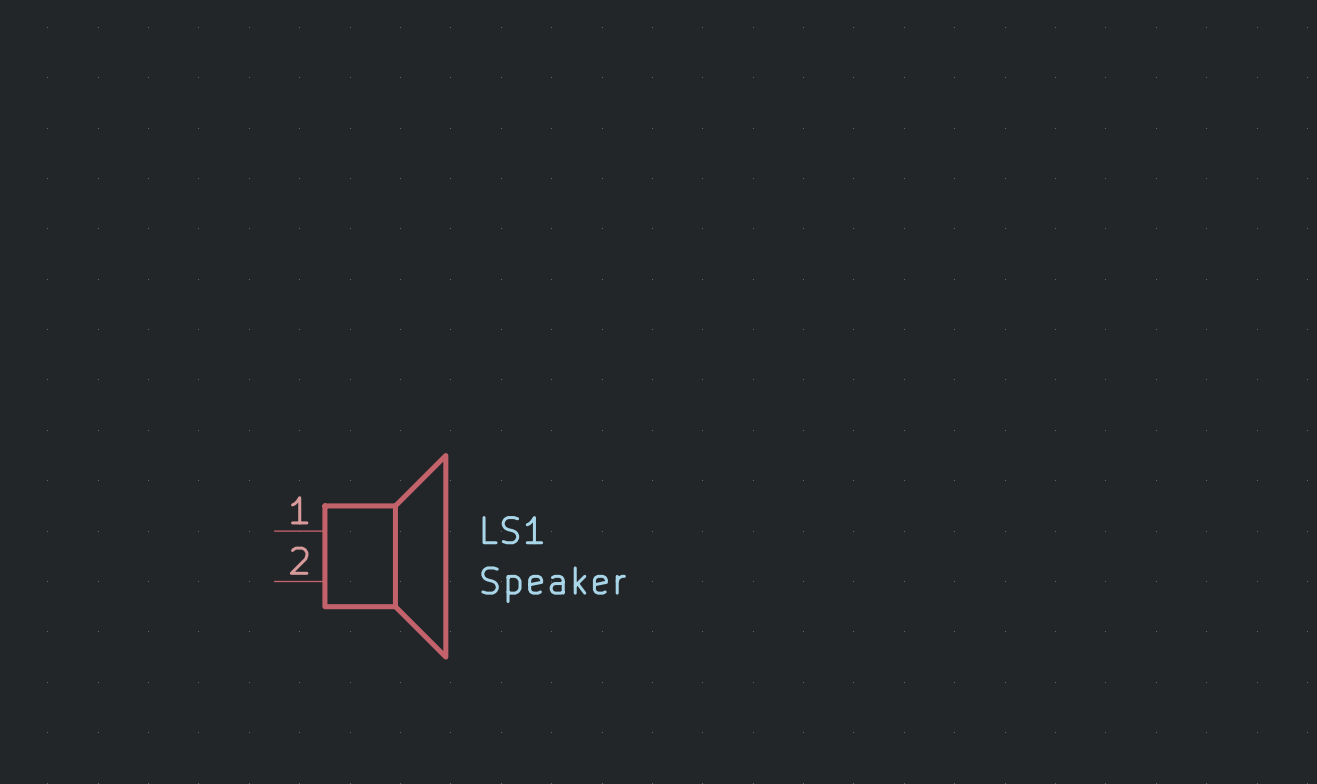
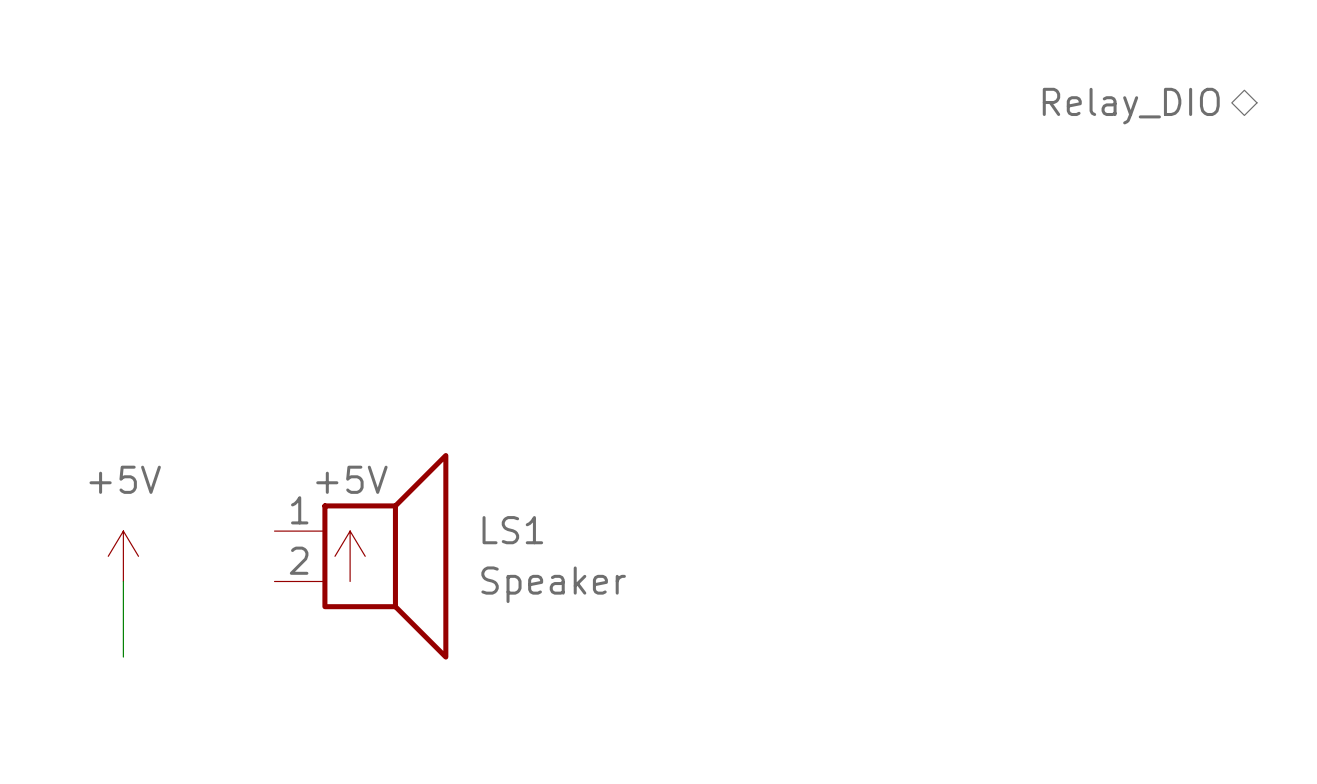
hierarchical label: none -> Relay_DIO (1131, 106)
power symbol: none -> +5V (123, 556)
power symbol: none -> +5V (350, 556)
wire: none -> (123, 581) (123, 657)

